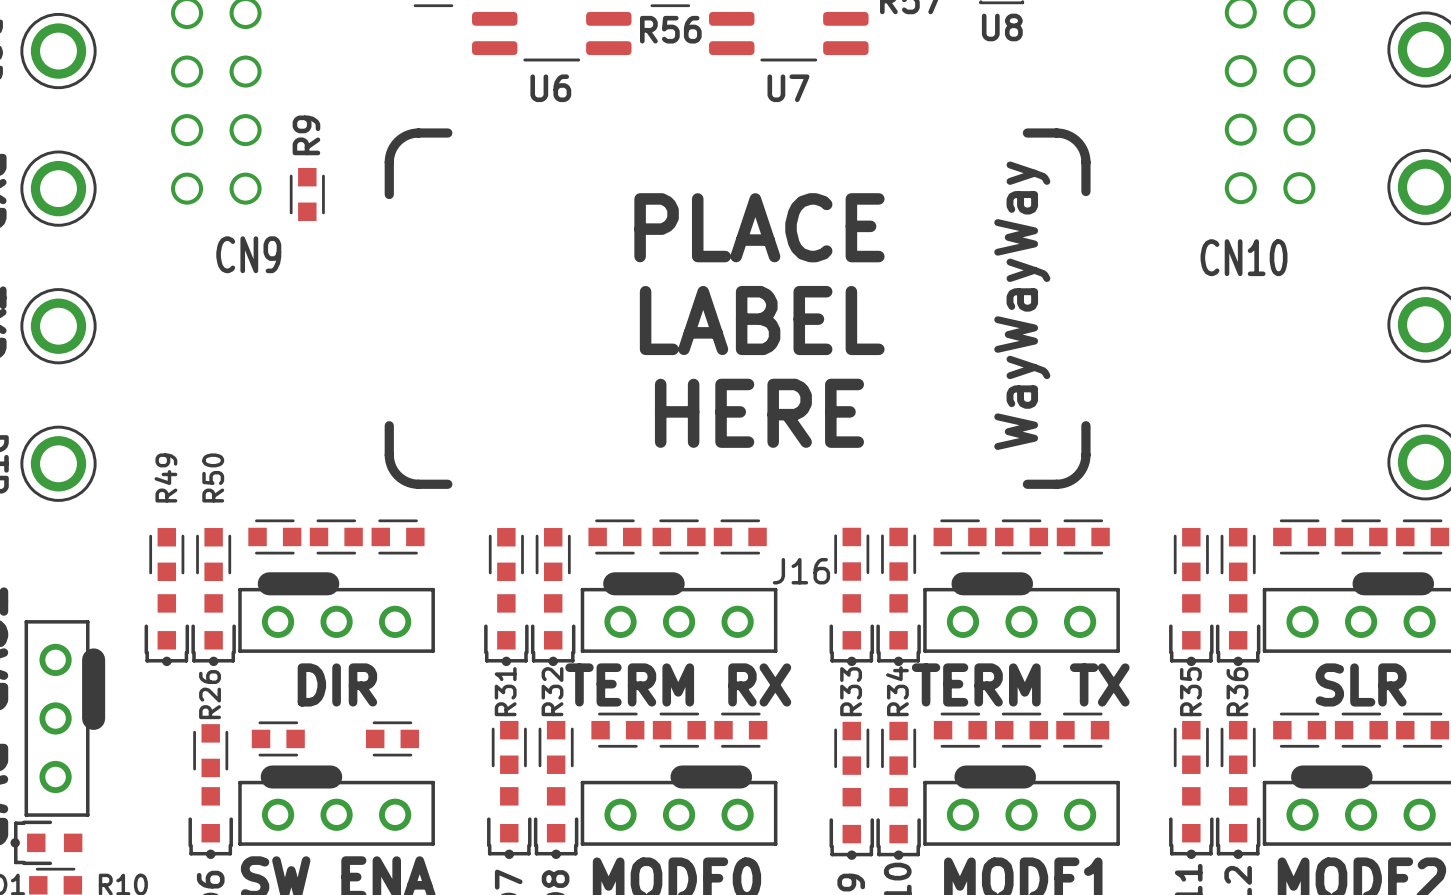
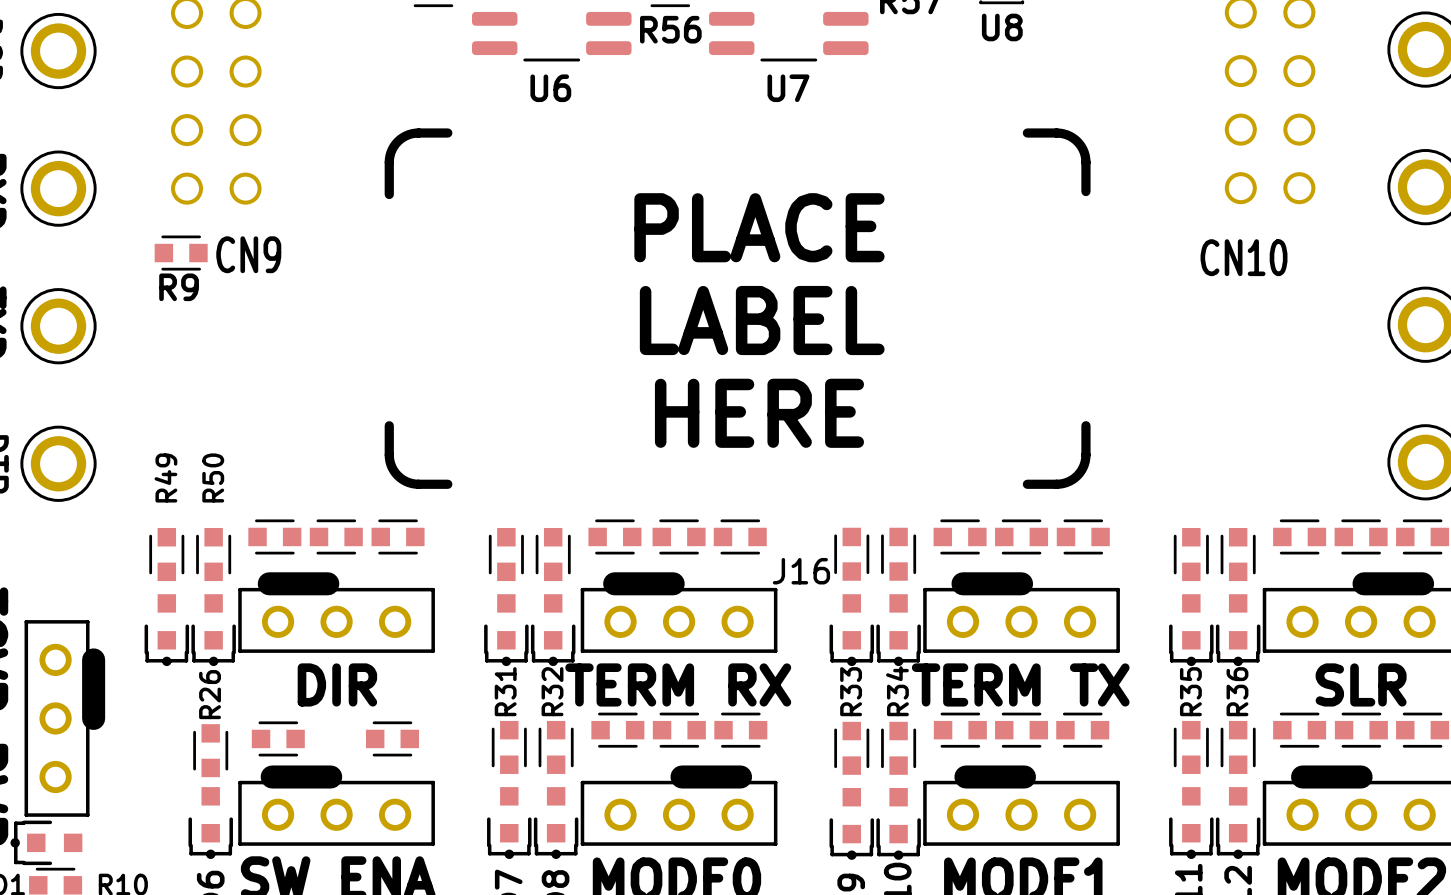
R9 name position: R9 (306, 135) -> R9 (179, 287)
R9 rotation: 0° (307, 194) -> 90° clockwise (181, 253)
R9 position: (307, 194) -> (181, 253)
text: WayWayWay (1022, 305) -> none

